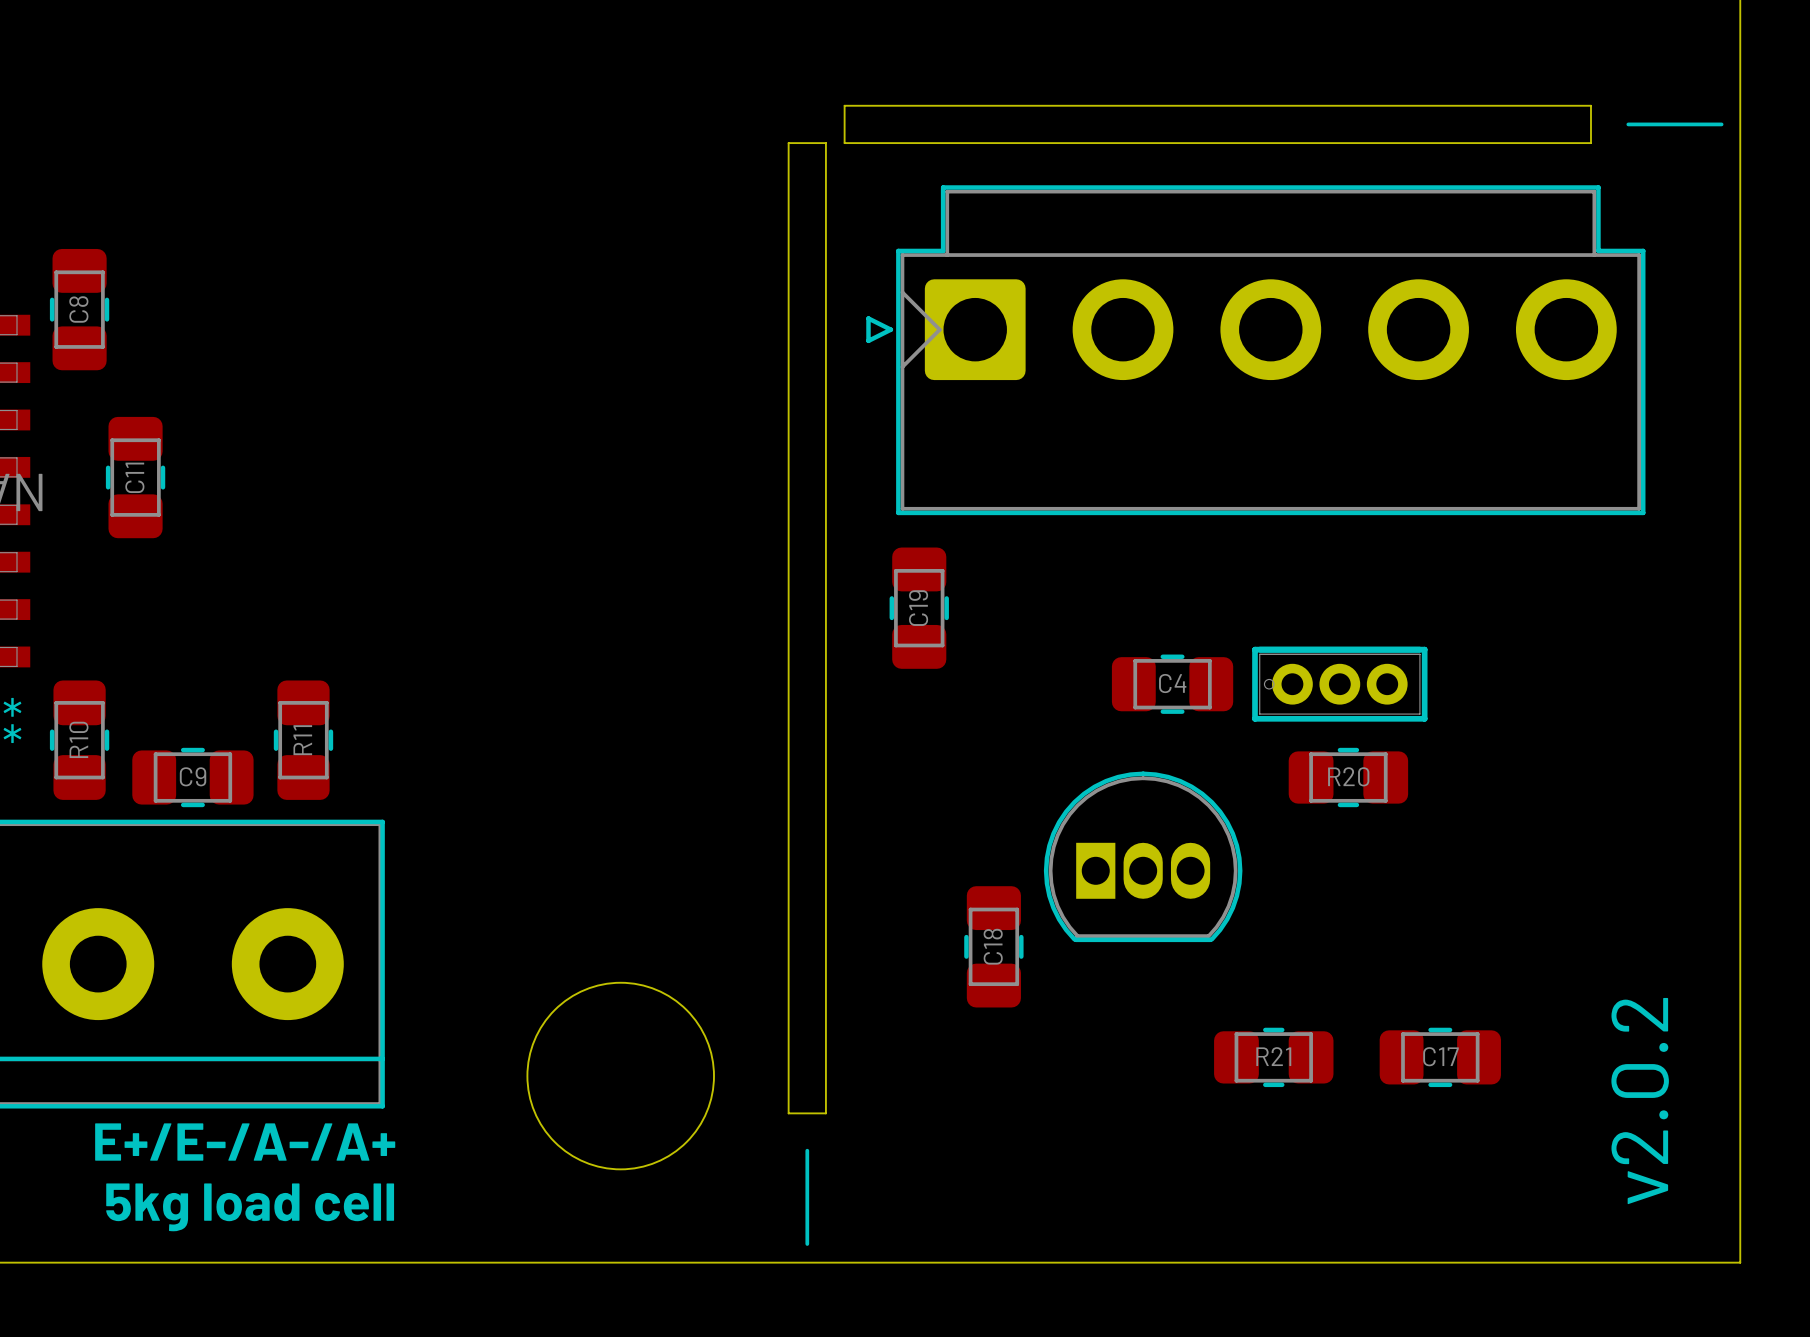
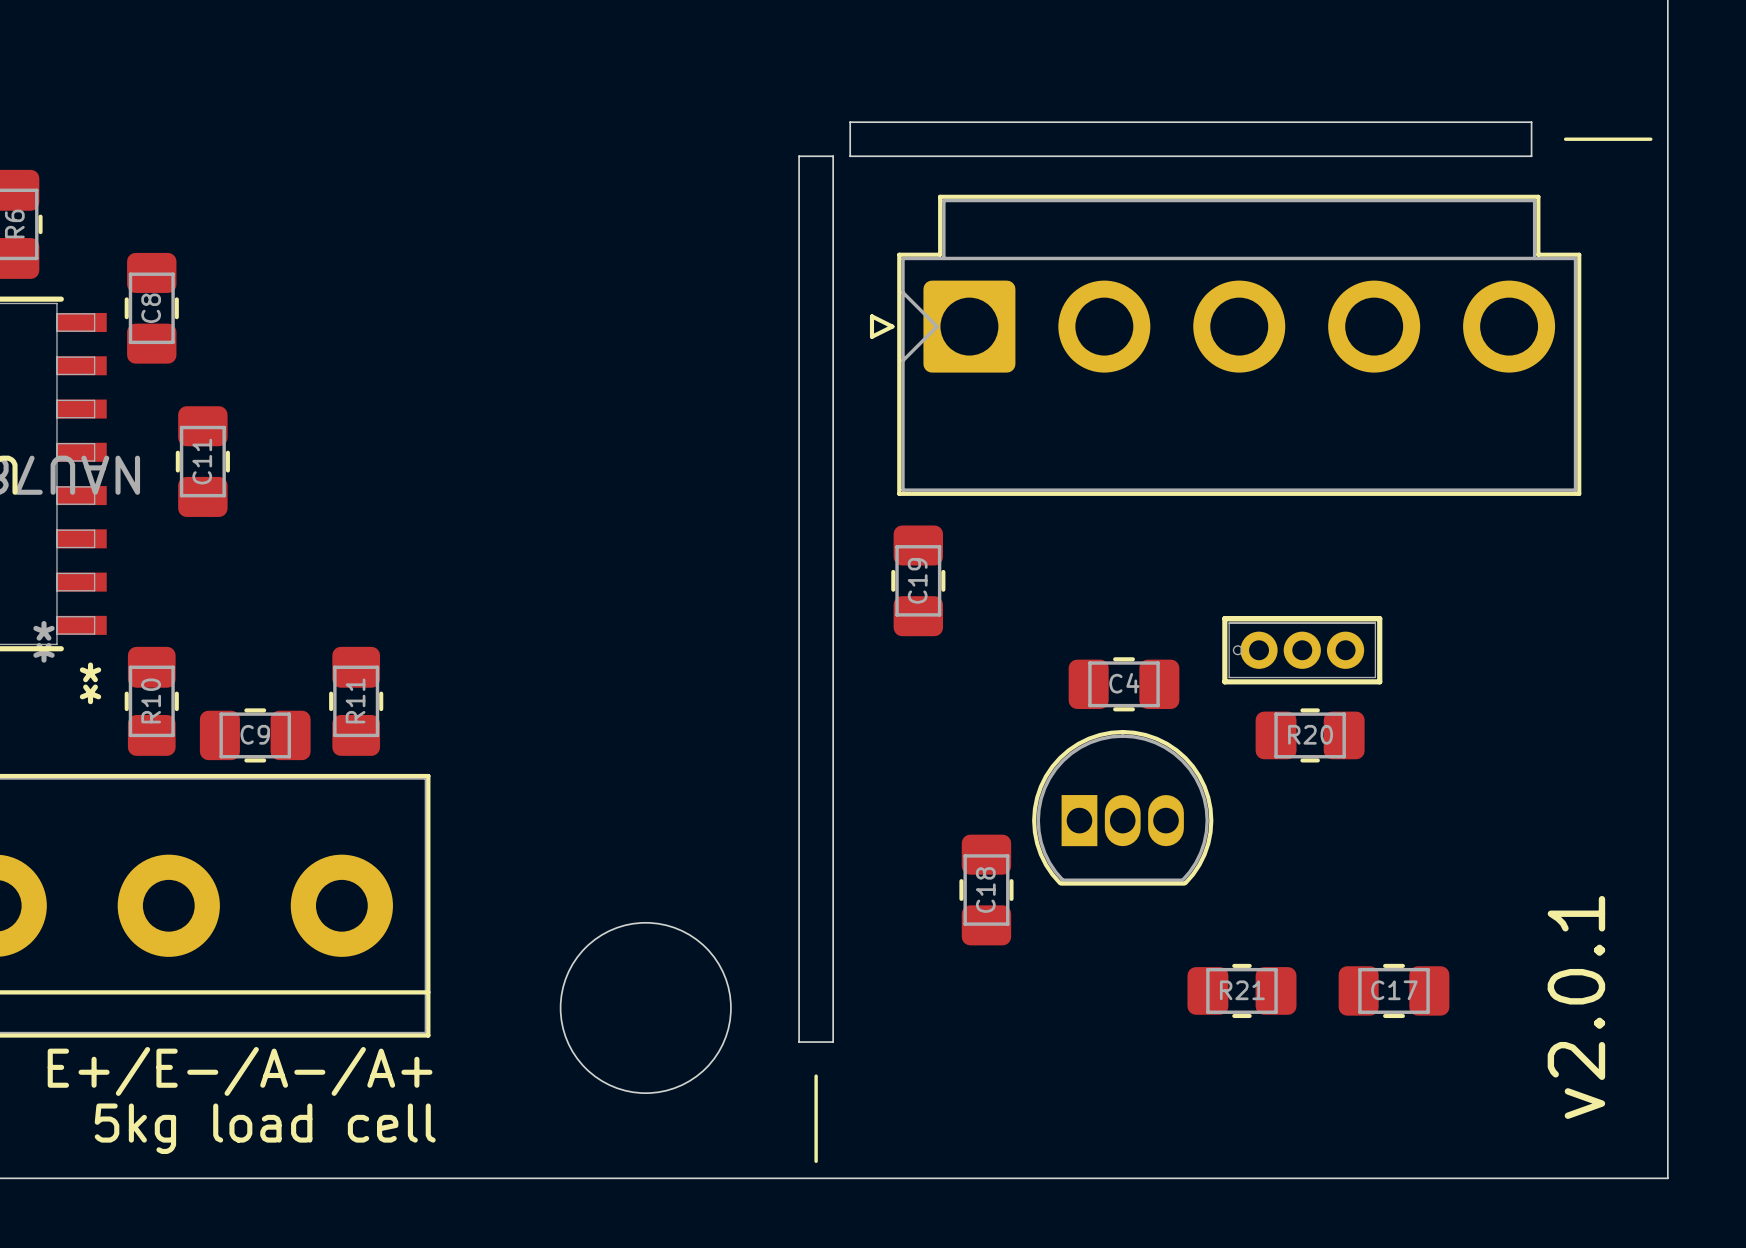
C4 position: (1172, 684) -> (1124, 684)
text: v2.0.2 (1640, 1101) -> v2.0.1 (1576, 1007)

